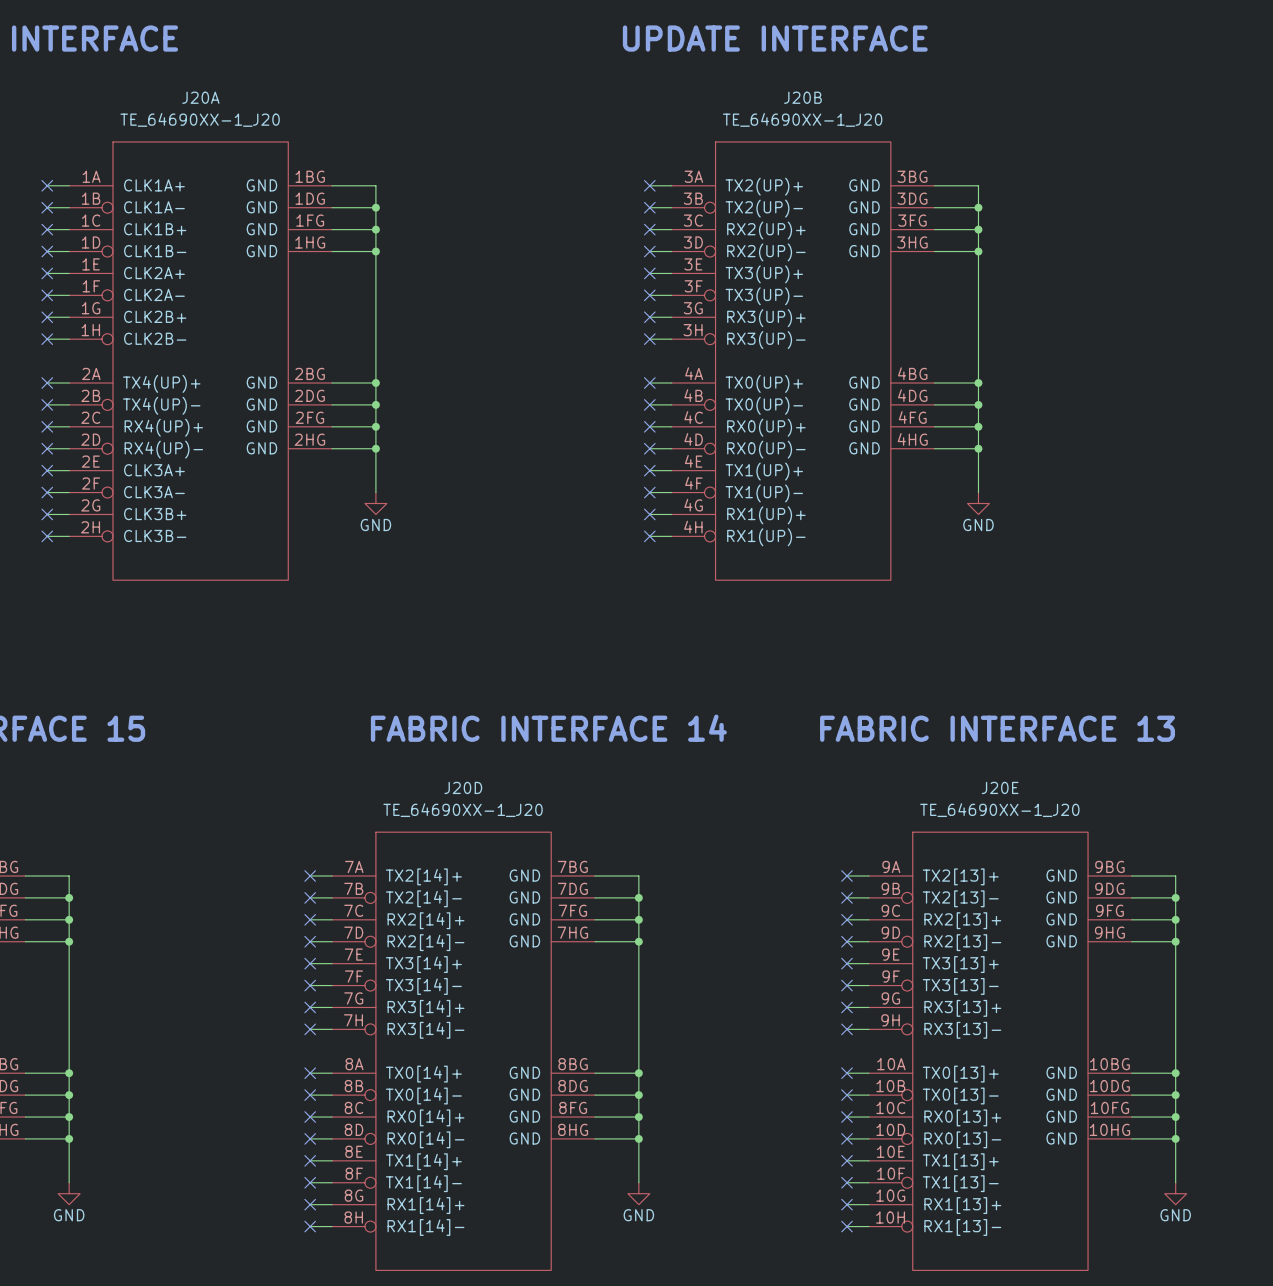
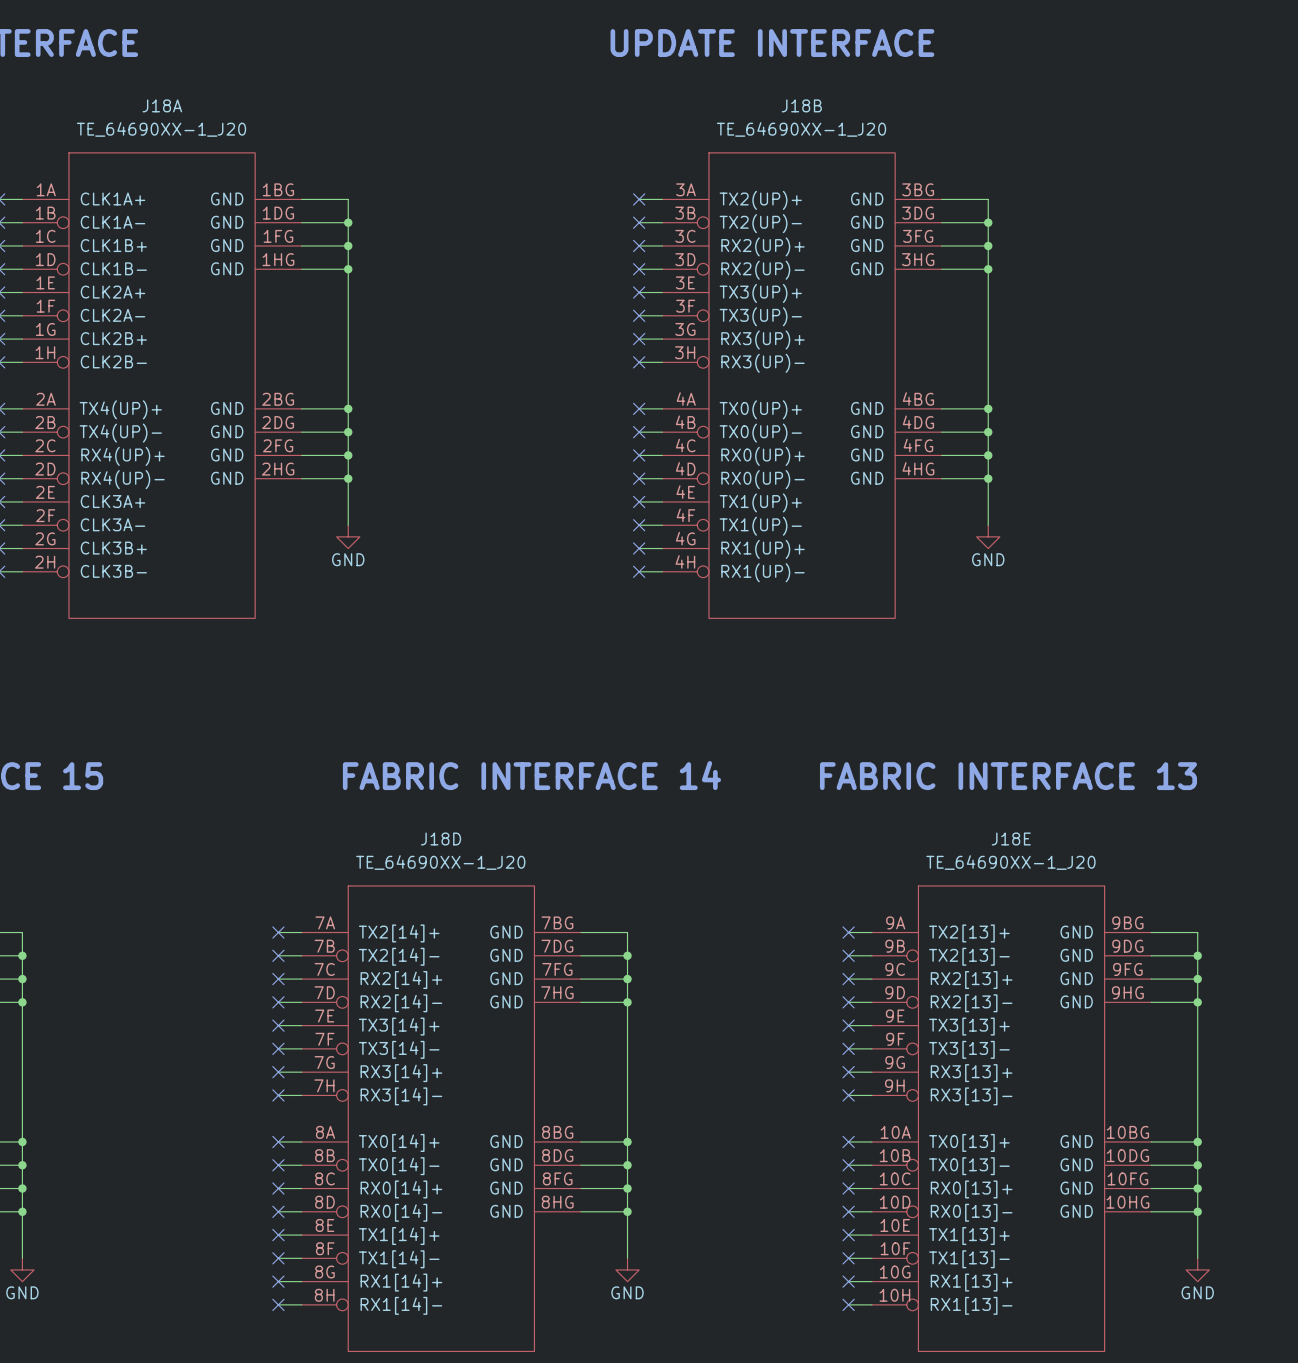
J20A name: J20A (200, 97) -> J18A (162, 105)
J20B name: J20B (802, 97) -> J18B (801, 105)
J20D name: J20D (463, 787) -> J18D (441, 839)
J20E name: J20E (1000, 787) -> J18E (1011, 839)

